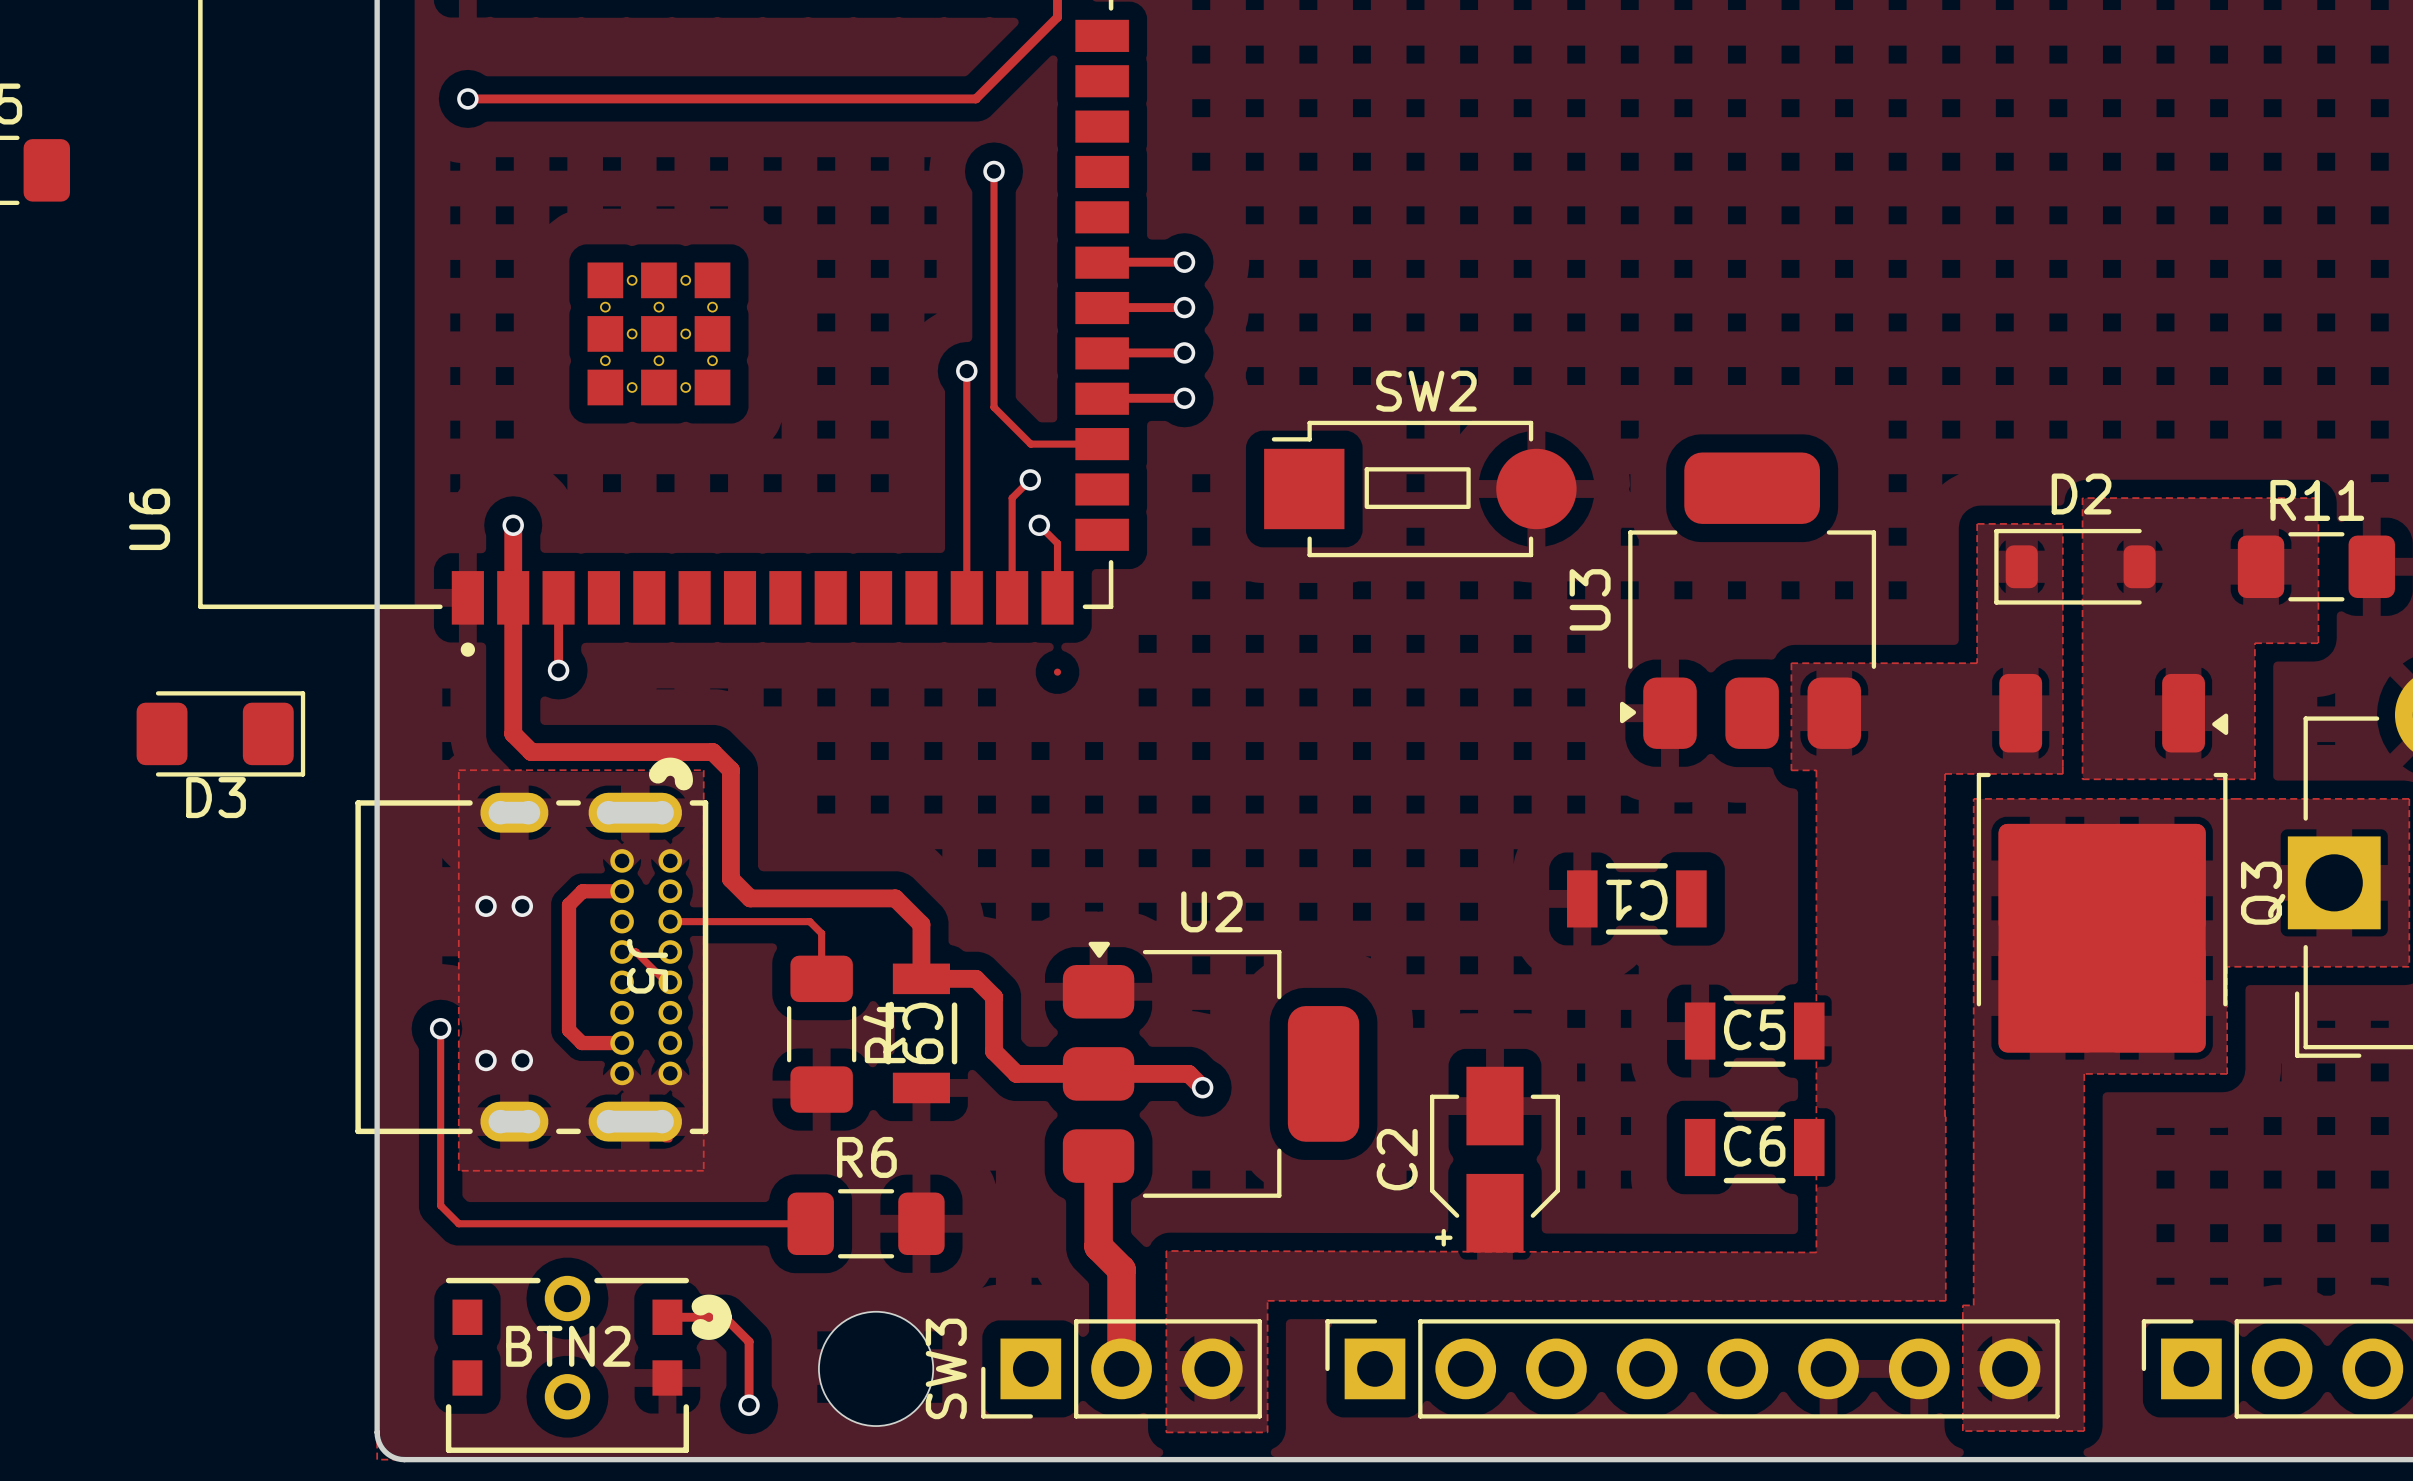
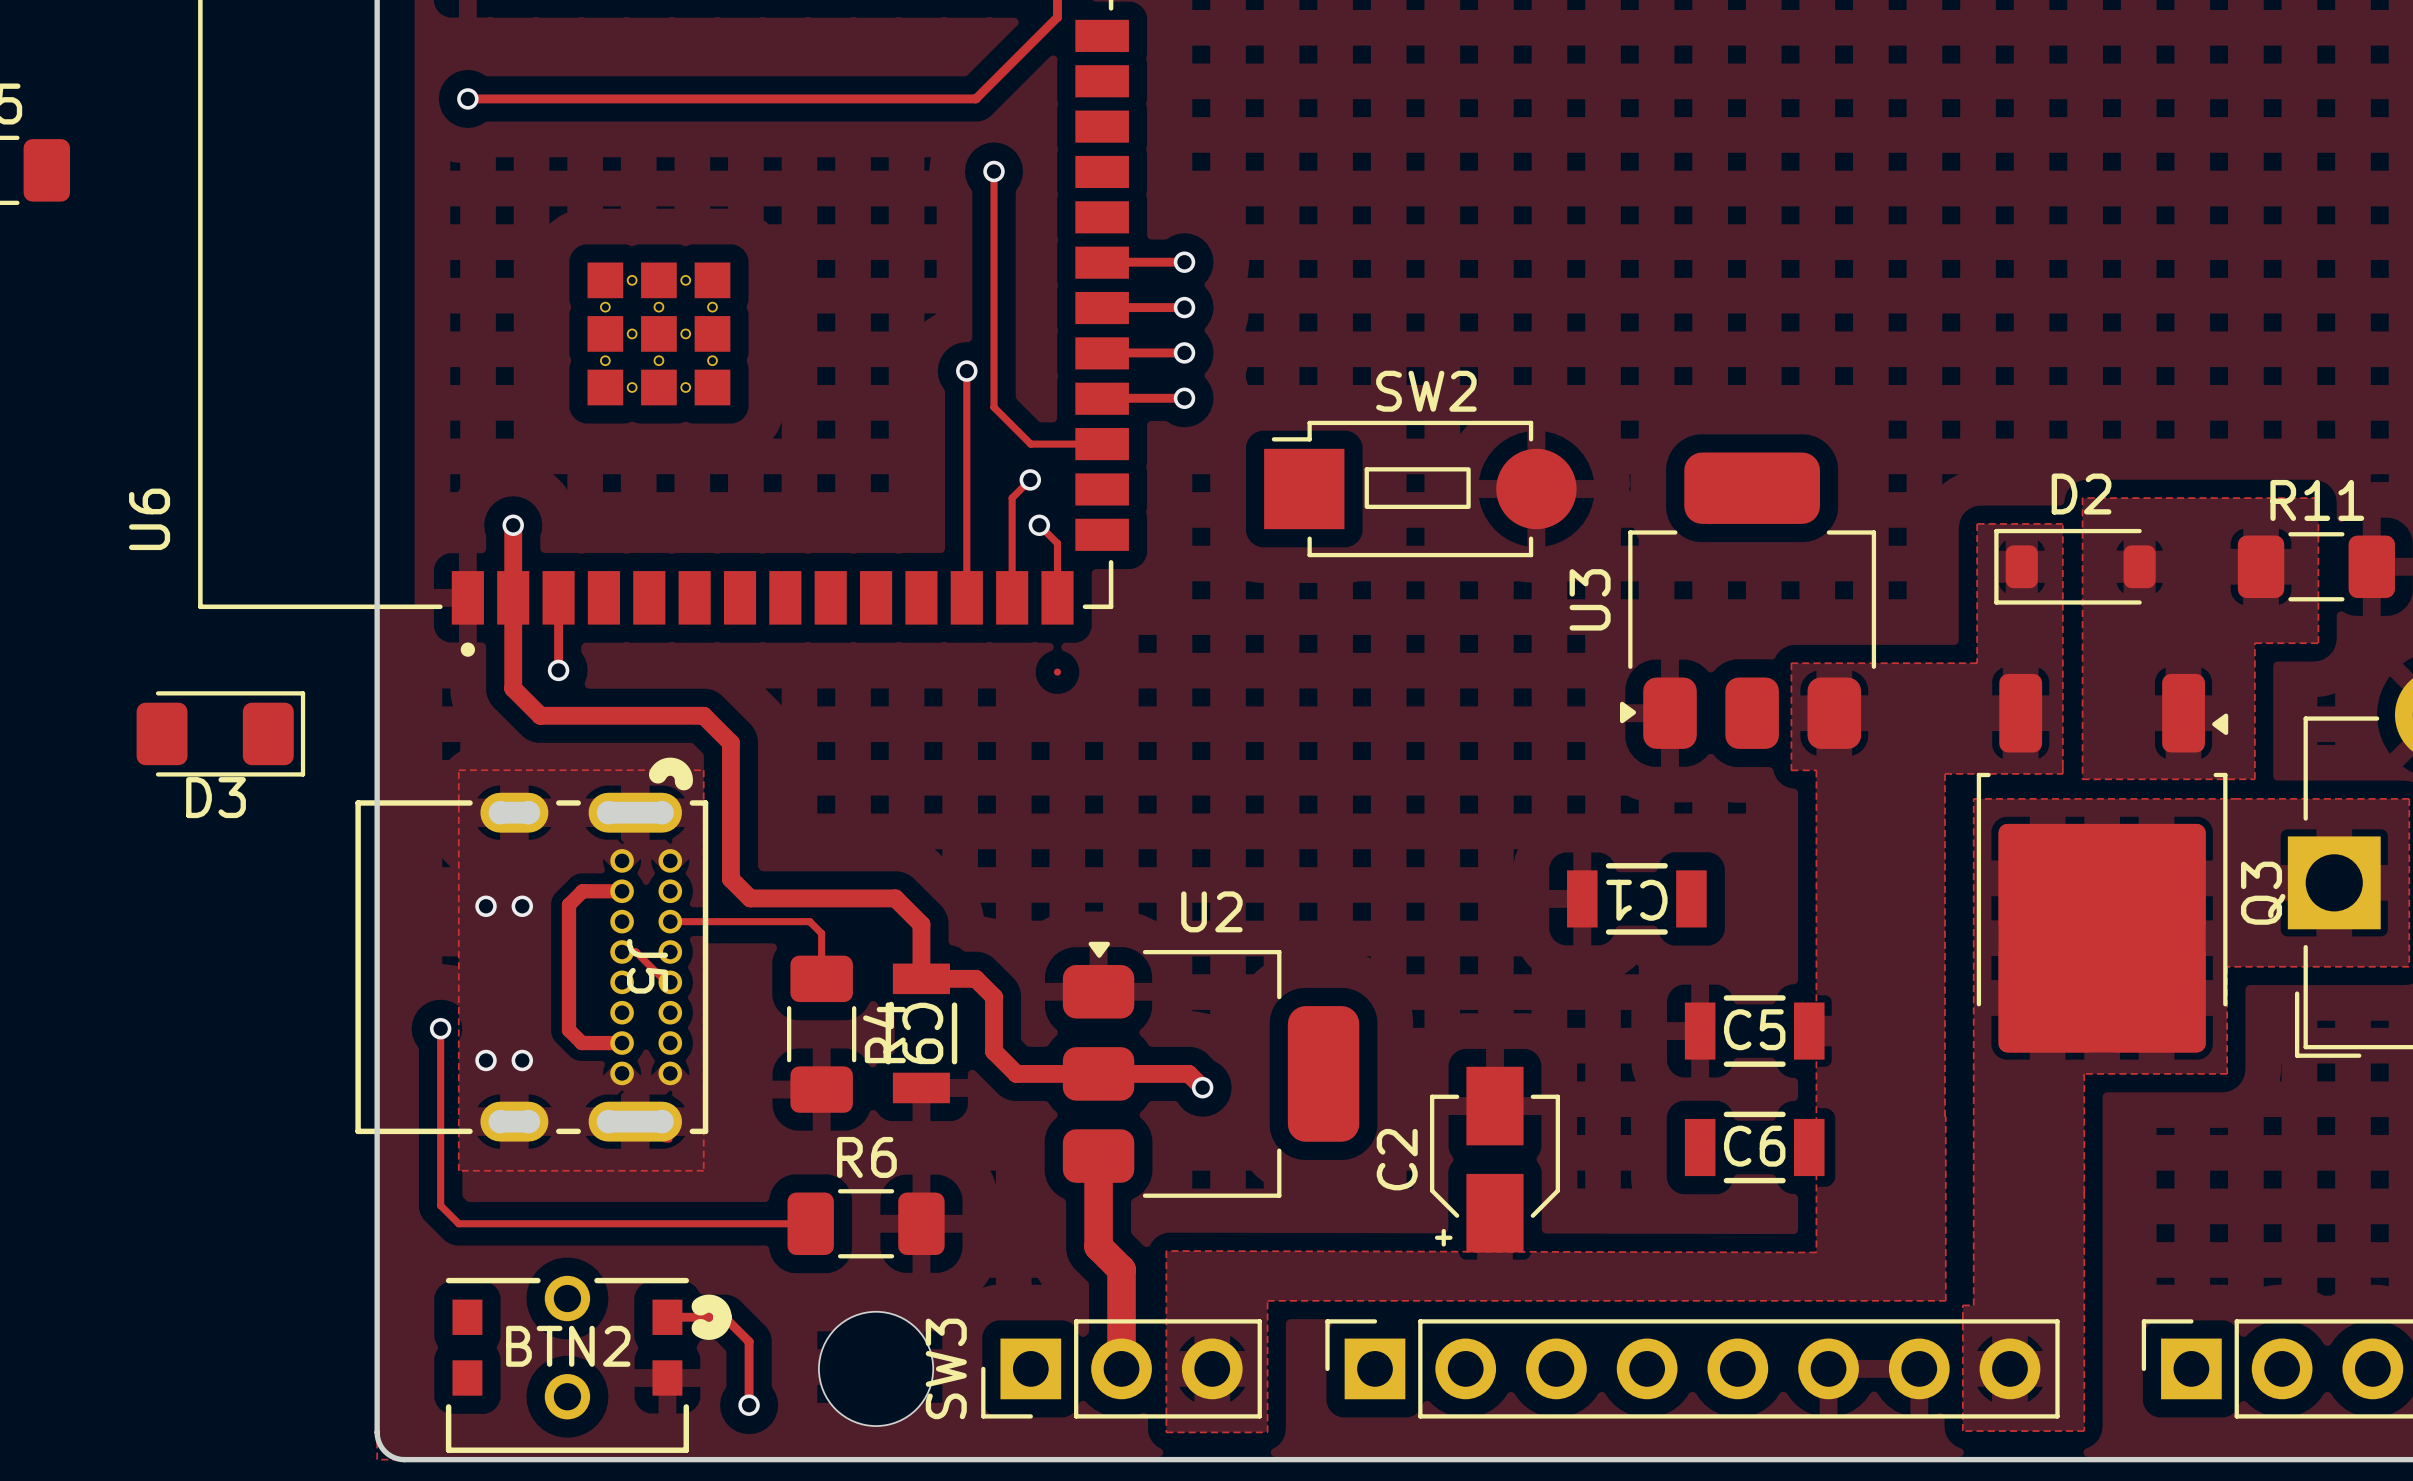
track: (513, 688) (513, 733) (531, 752) (712, 752) (730, 770) -> (513, 688) (540, 715) (703, 715) (730, 742) (730, 770)

